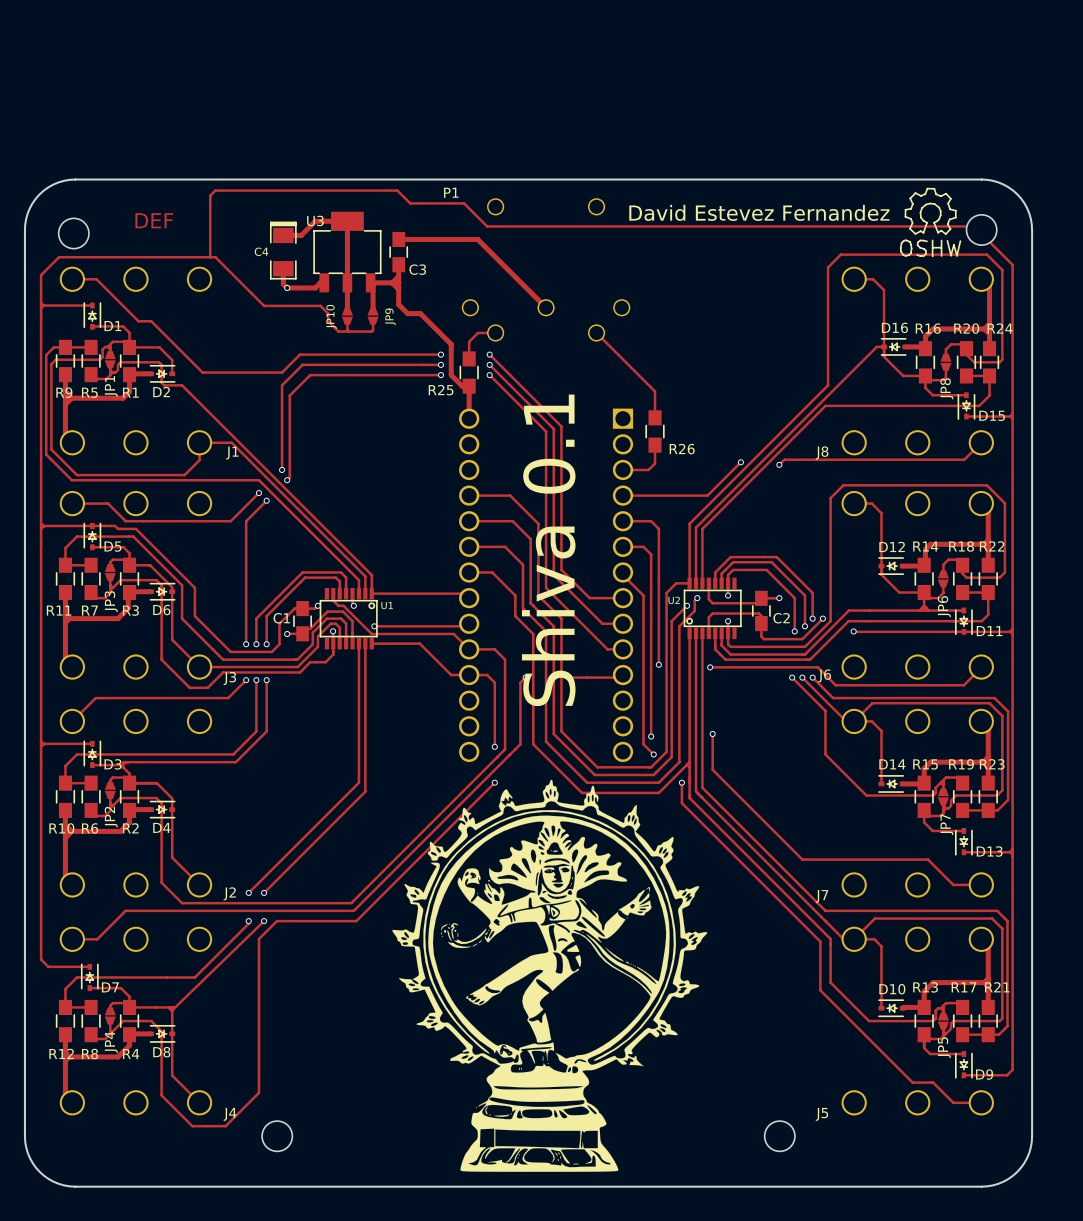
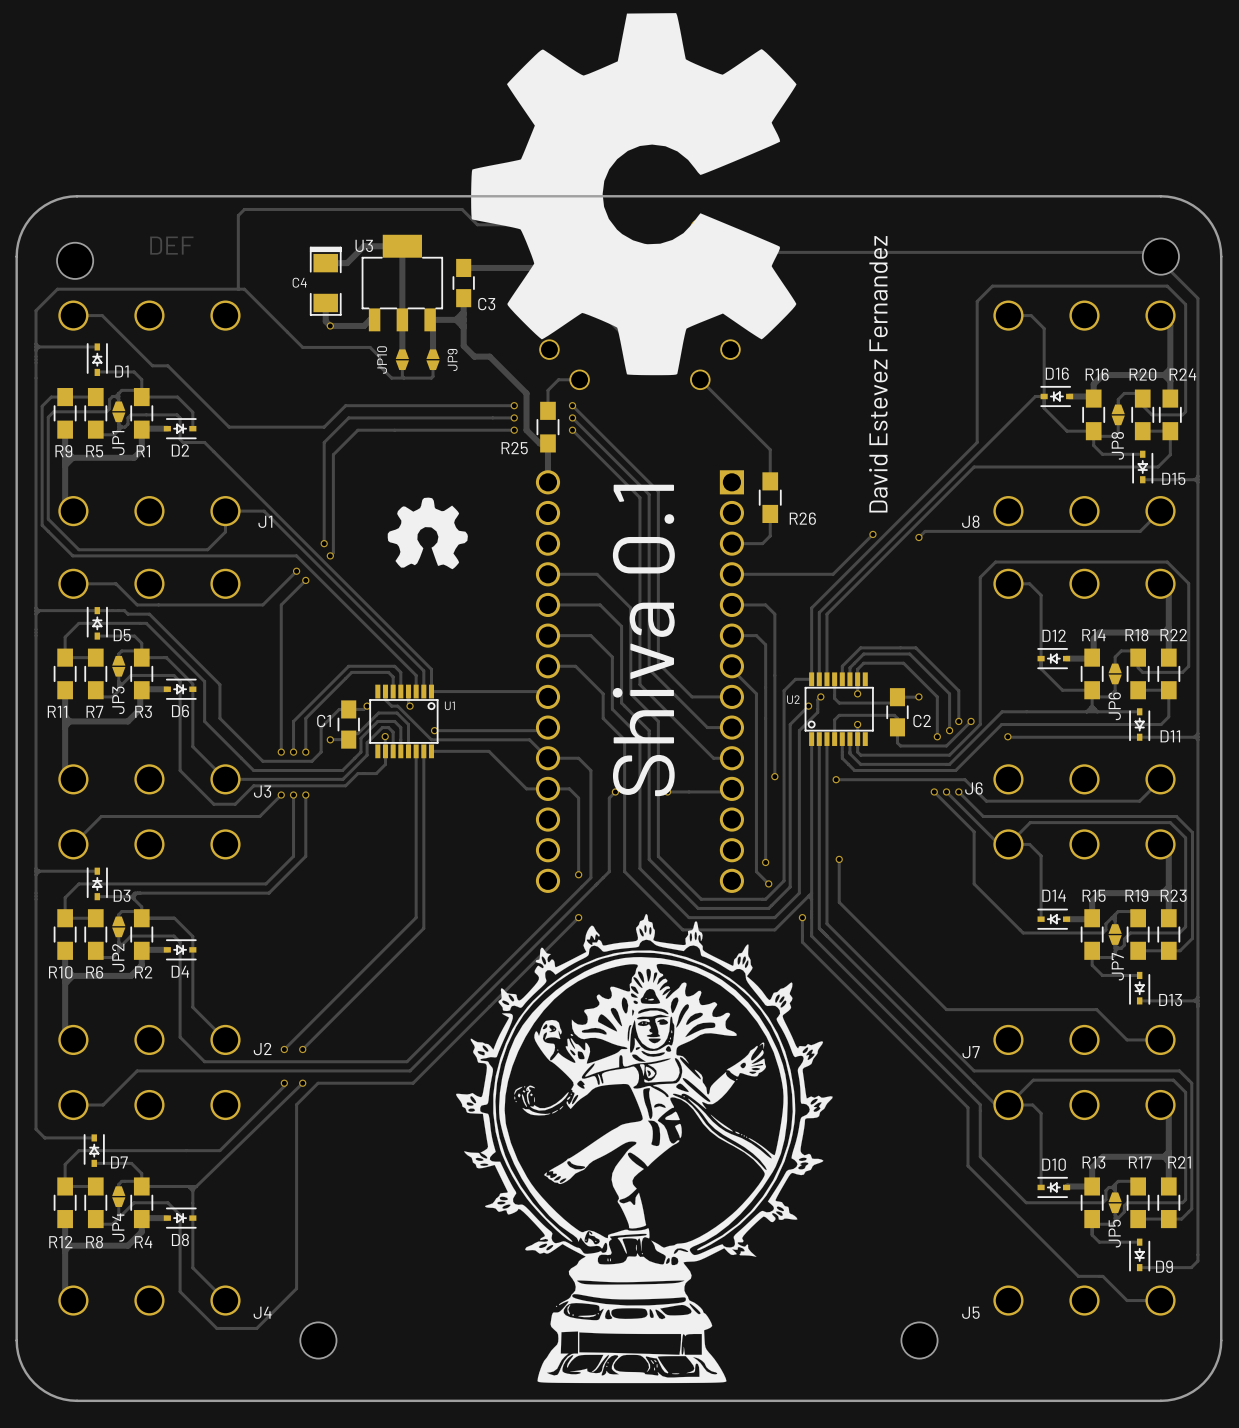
drawing: none -> [471, 13, 797, 376]
drawing: [899, 187, 962, 257] -> none
text rotation: 0° (759, 212) -> 90° counterclockwise (878, 374)
drawing: none -> [387, 497, 468, 570]

